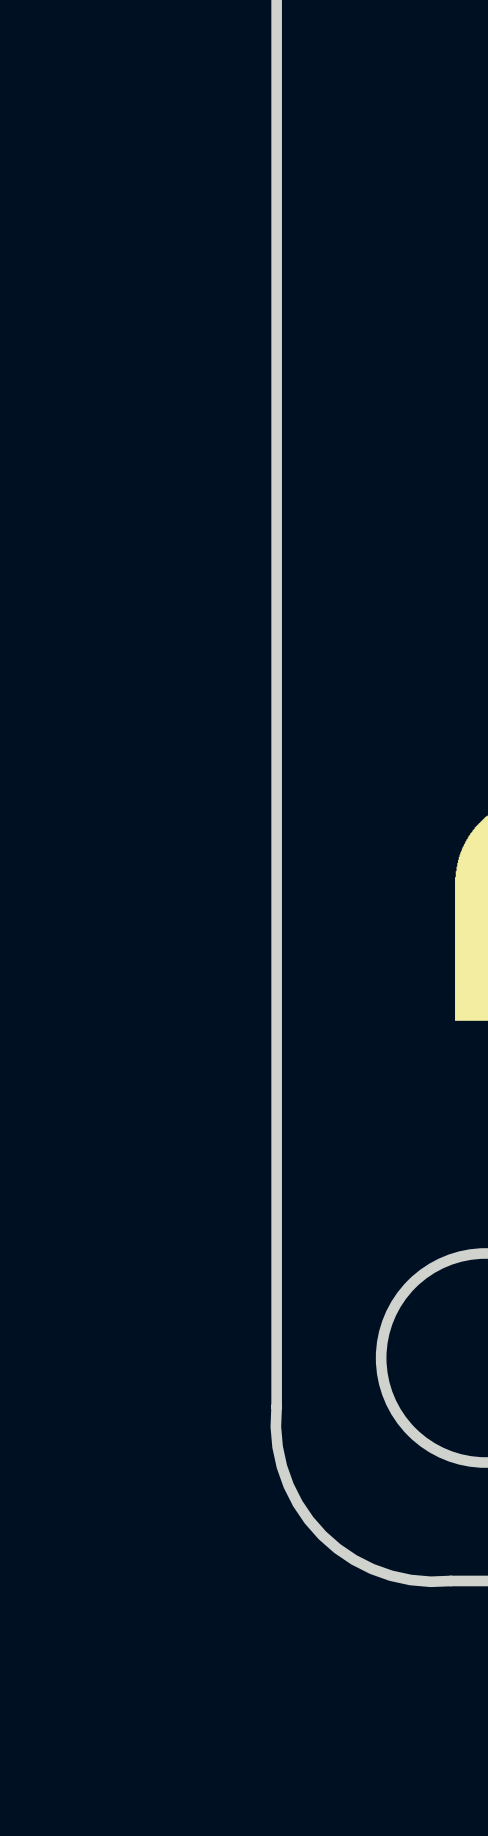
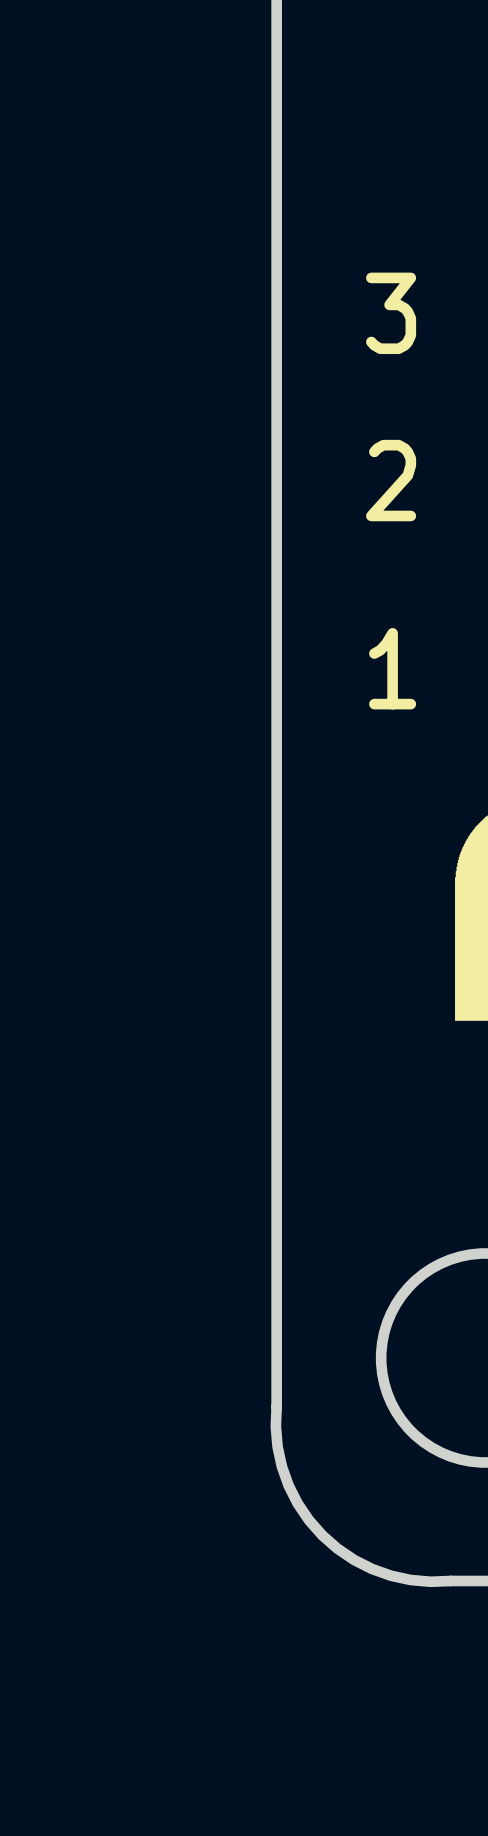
text: none -> 3 (391, 313)
text: none -> 2 (391, 480)
text: none -> 1 (392, 668)

